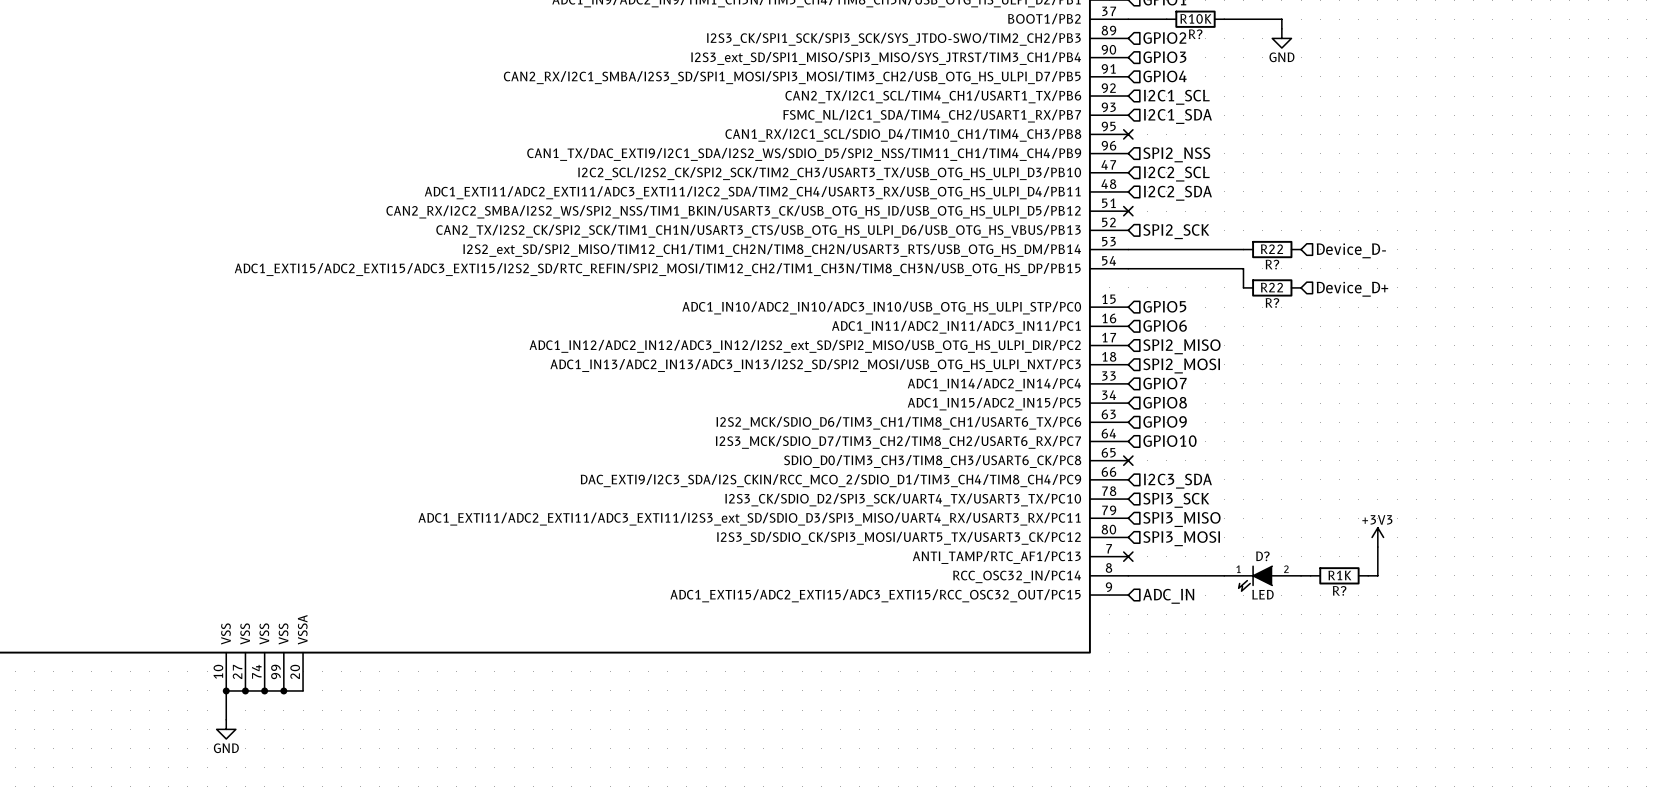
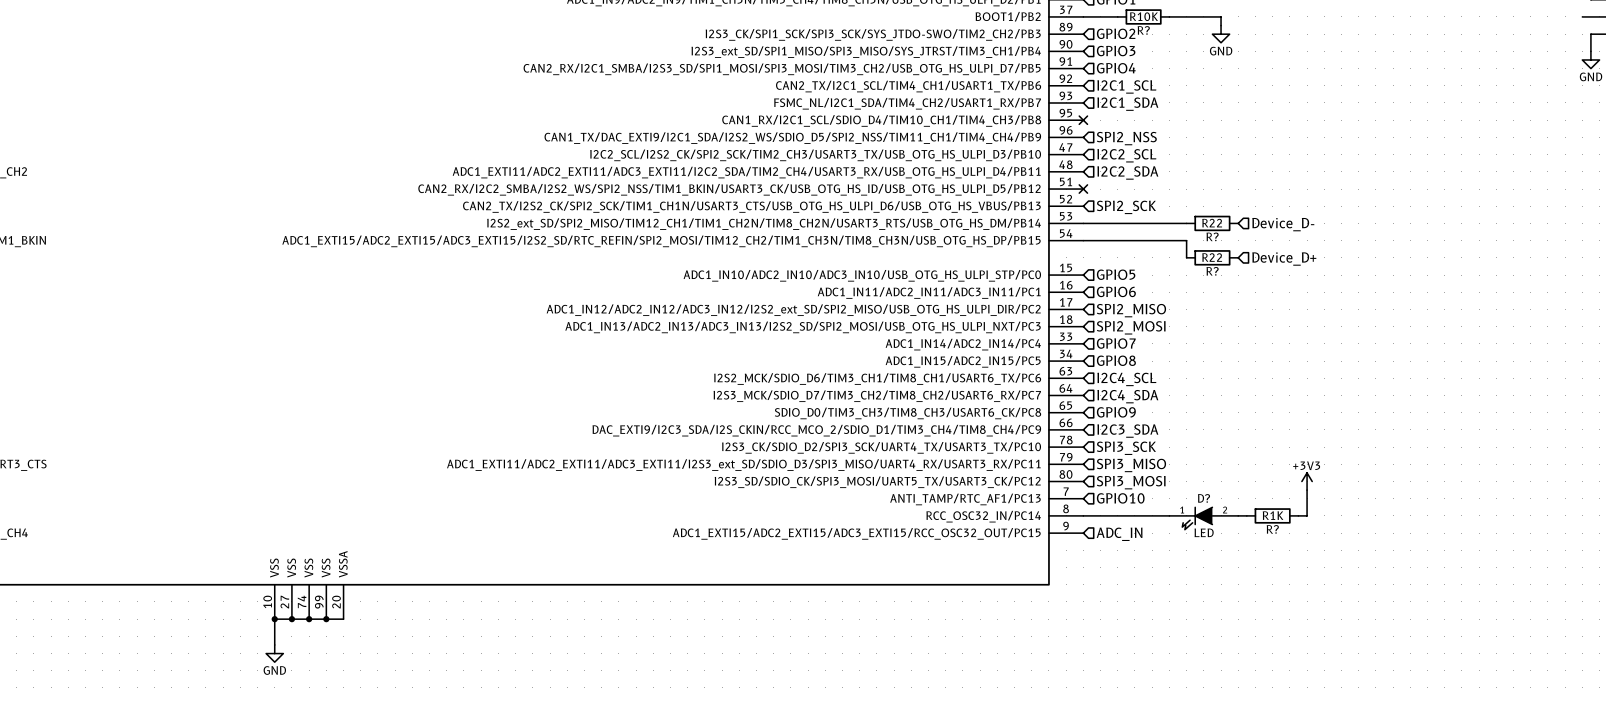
hierarchical label: GPIO9 (1165, 421) -> I2C4_SCL (1126, 379)
hierarchical label: GPIO10 (1169, 441) -> I2C4_SDA (1127, 396)
no-connect mark: (1128, 460) -> none
hierarchical label: none -> GPIO9 (1116, 412)
no-connect mark: (1128, 556) -> none
hierarchical label: none -> GPIO10 (1120, 498)

